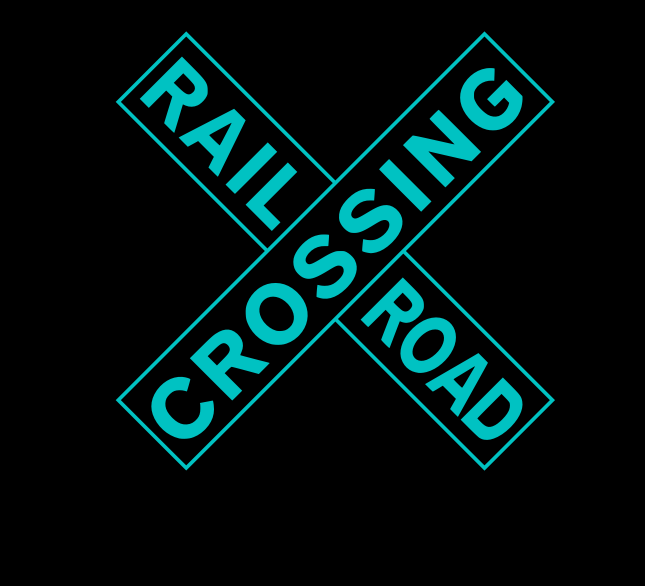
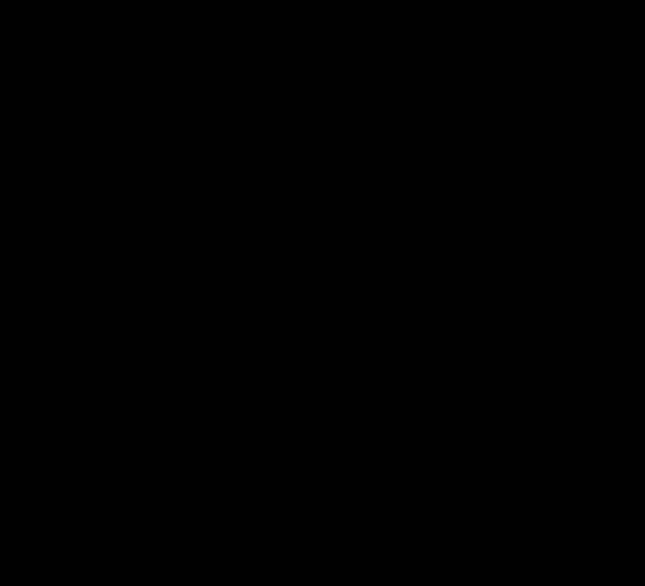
drawing: [115, 31, 556, 471] -> none

